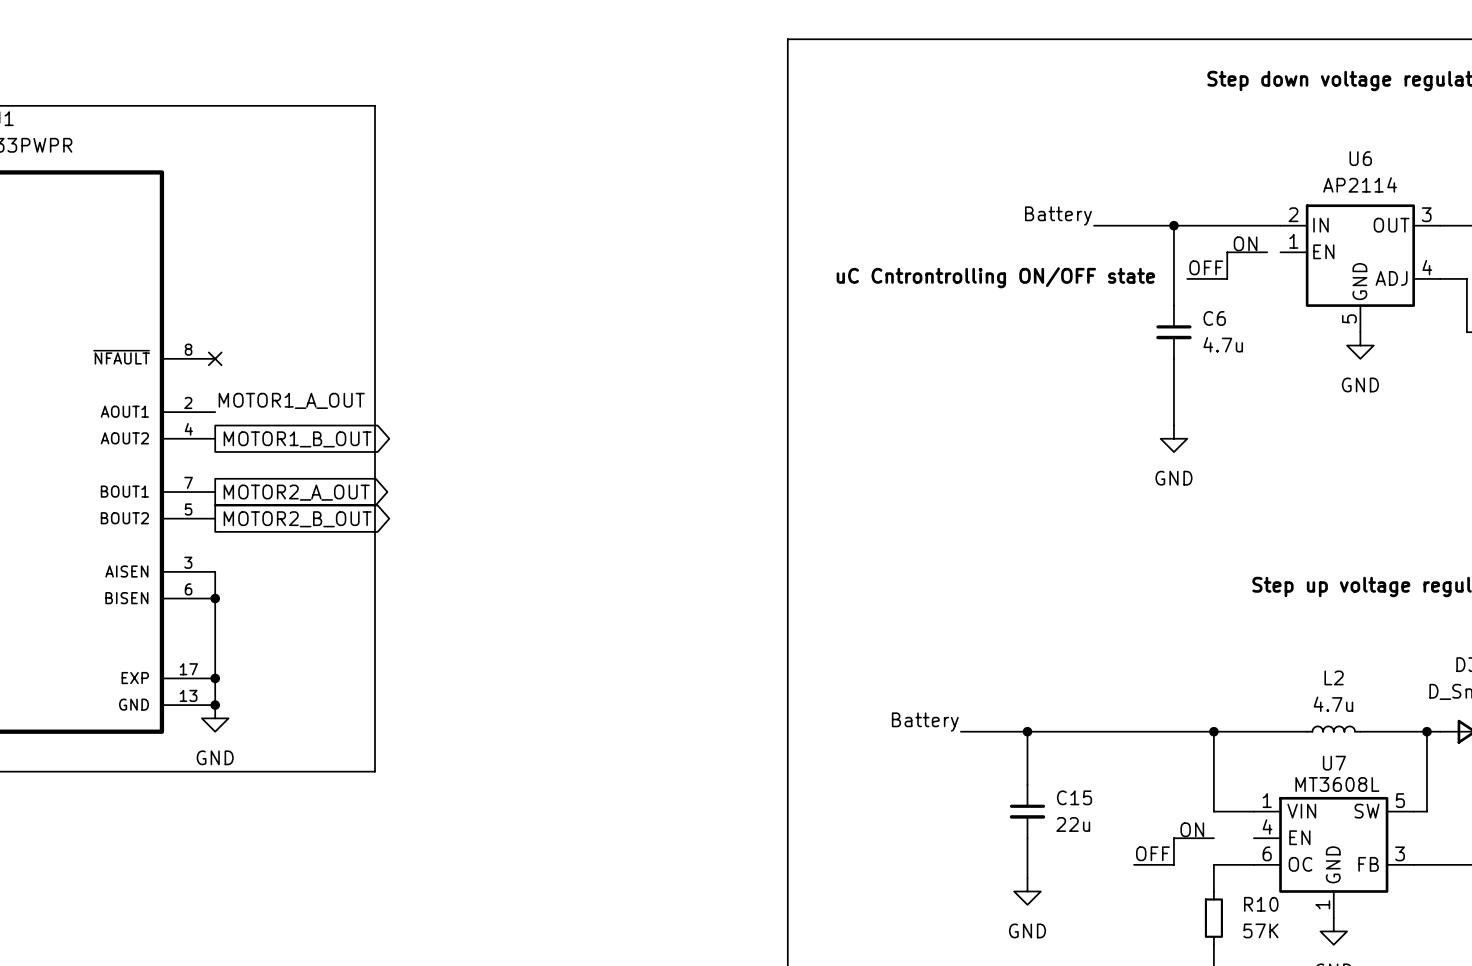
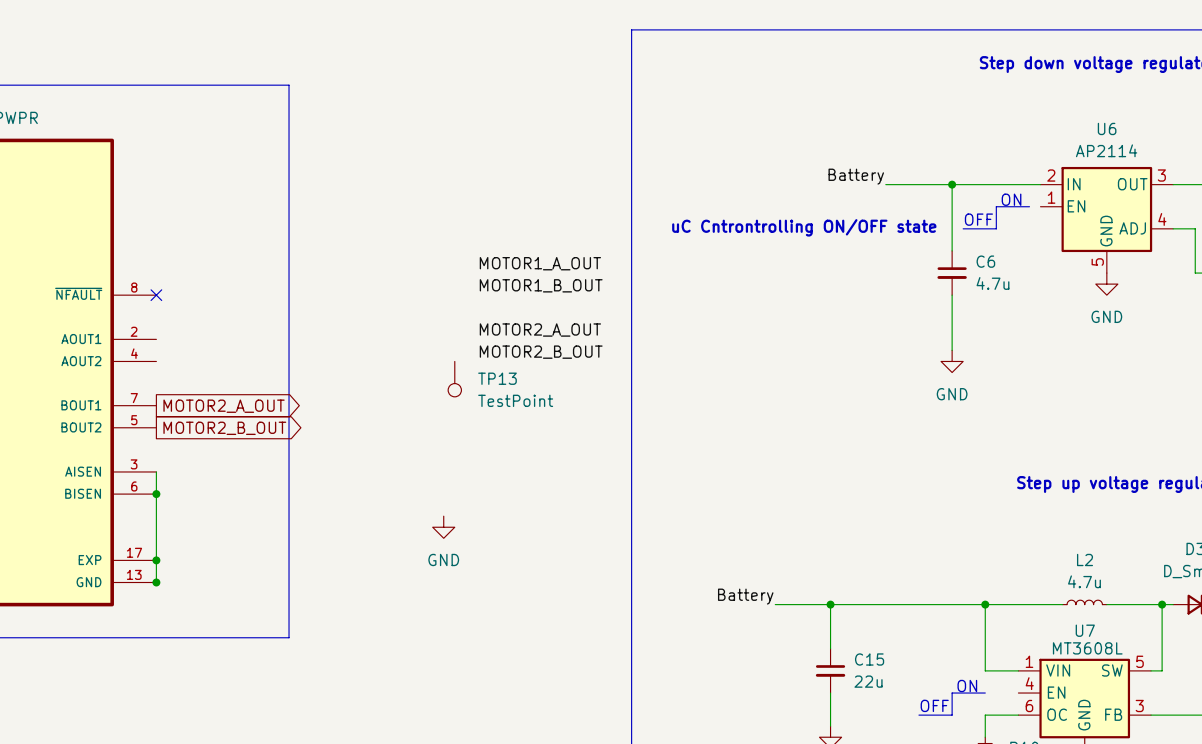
label: none -> MOTOR1_A_OUT (540, 263)
label: none -> MOTOR1_B_OUT (541, 285)
label: MOTOR1_A_OUT (291, 400) -> none
label: none -> MOTOR2_A_OUT (540, 330)
label: none -> MOTOR2_B_OUT (541, 352)
global label: MOTOR1_B_OUT (297, 439) -> none
TP13: none -> TestPoint (454, 379)
power symbol: none -> GND (443, 527)
power symbol: GND (215, 718) -> none

